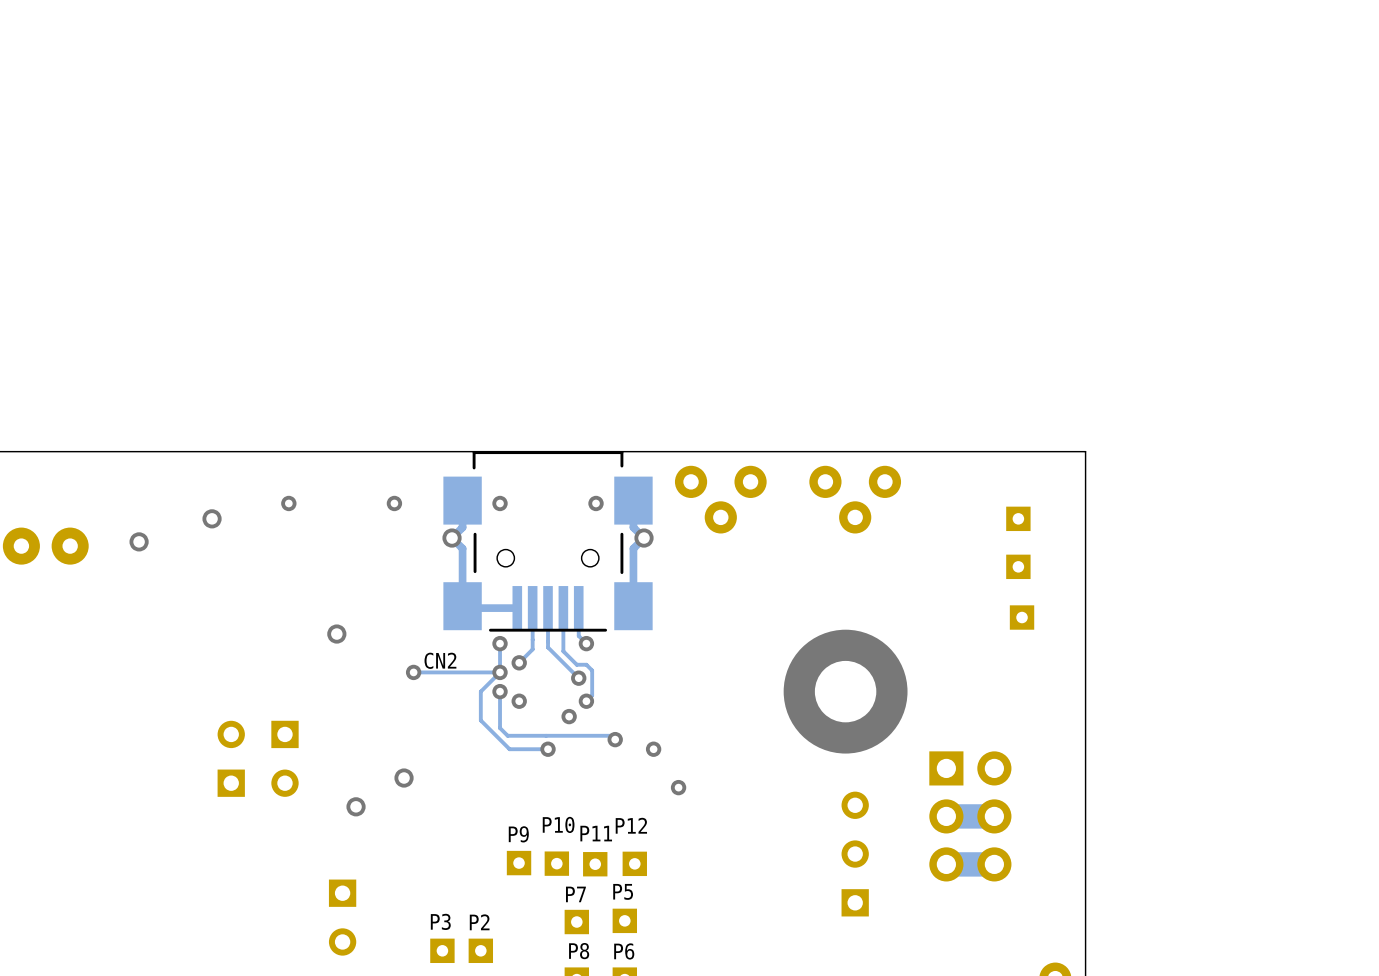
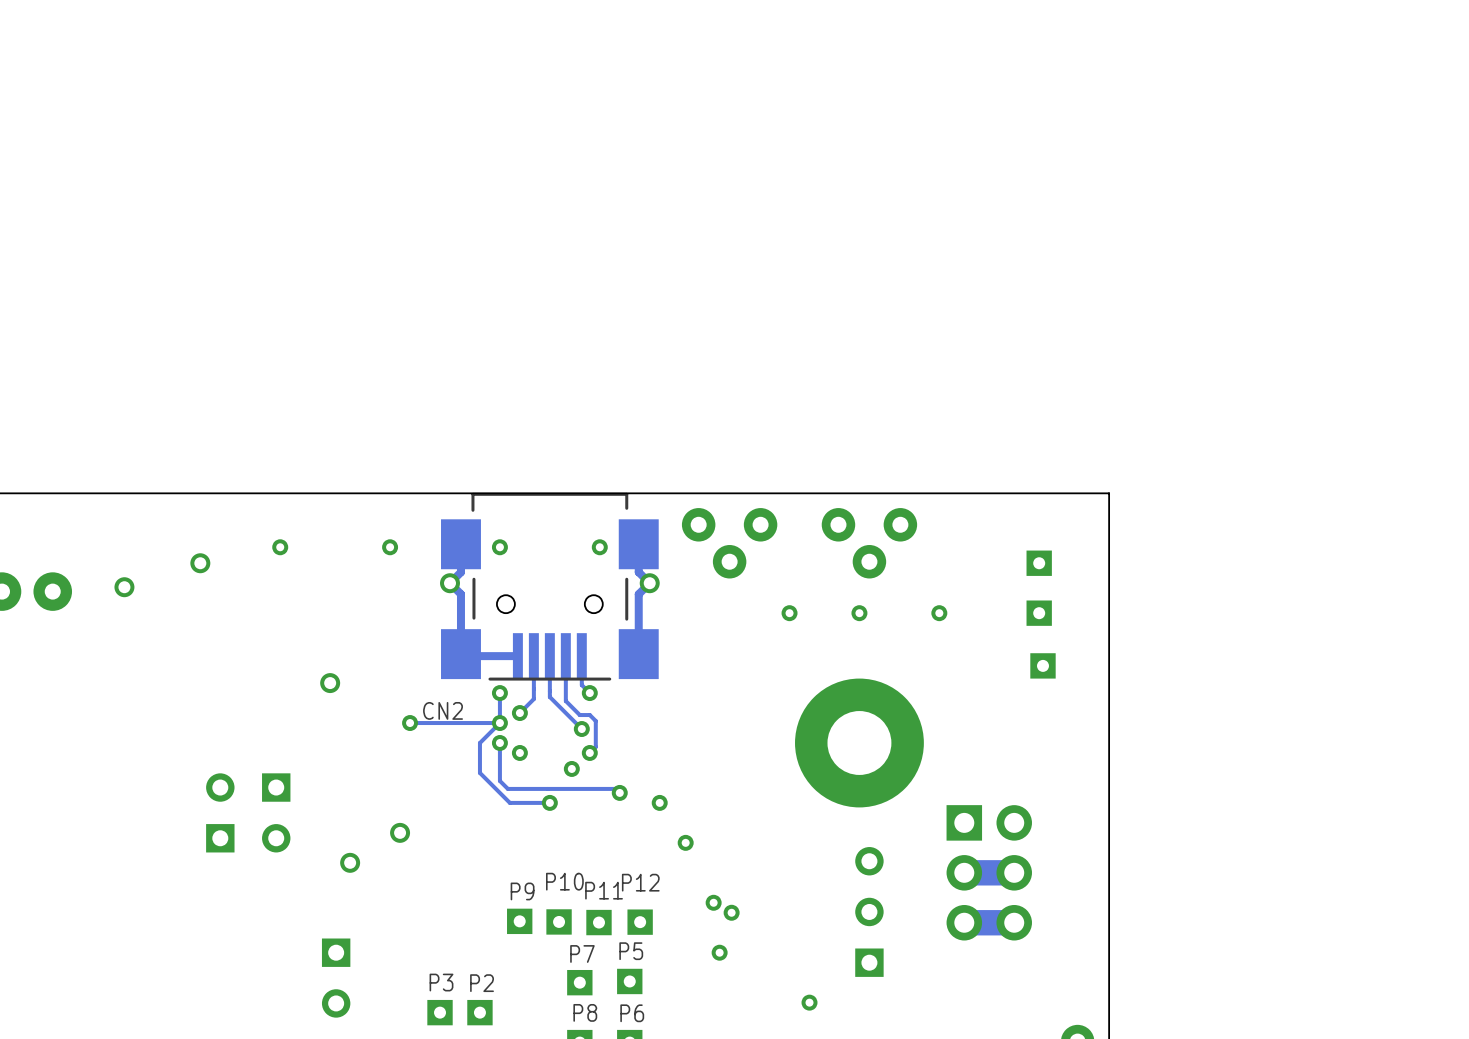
via: none -> (789, 613)
via: none -> (859, 613)
via: none -> (939, 613)
via: none -> (713, 902)
via: none -> (731, 912)
via: none -> (719, 952)
via: none -> (809, 1002)

